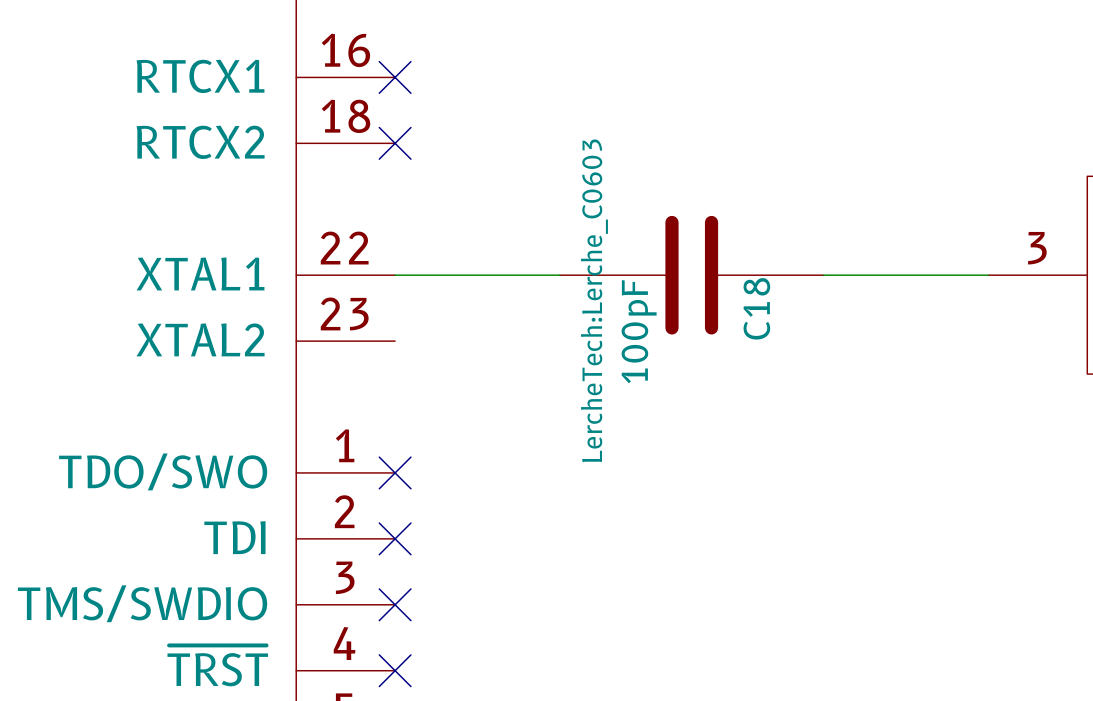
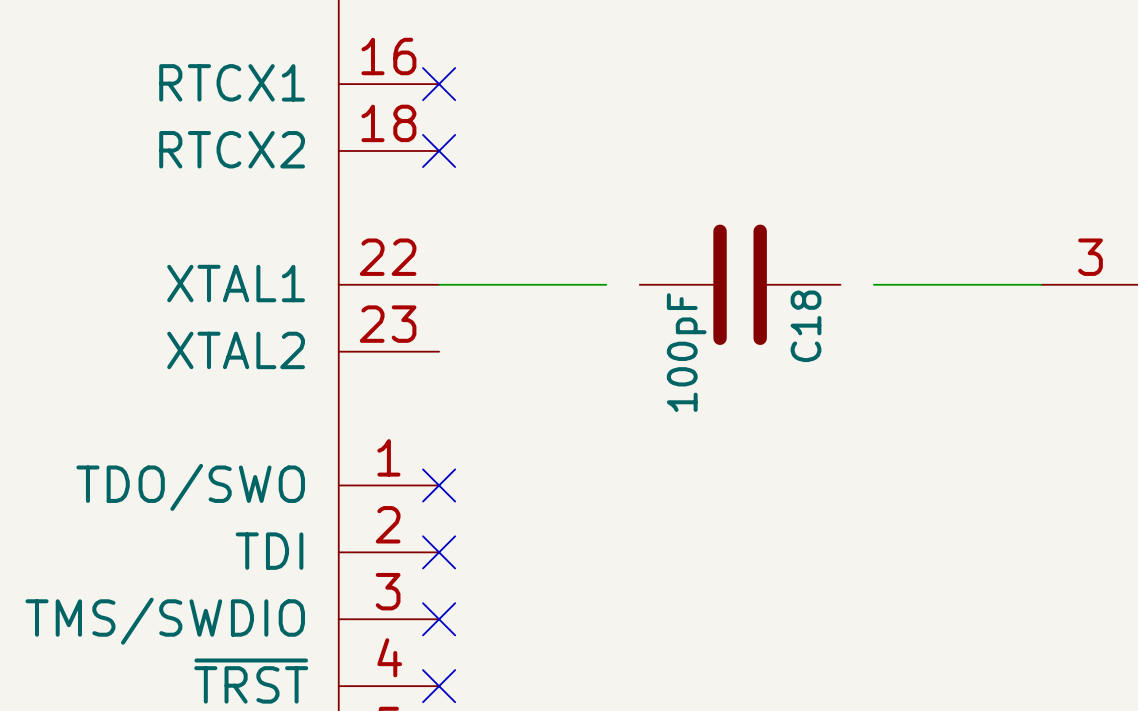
C18 symbol: [559, 215, 824, 335] -> [639, 224, 841, 345]
C18 text: LercheTech:Lerche_C0603 (594, 300) -> none

